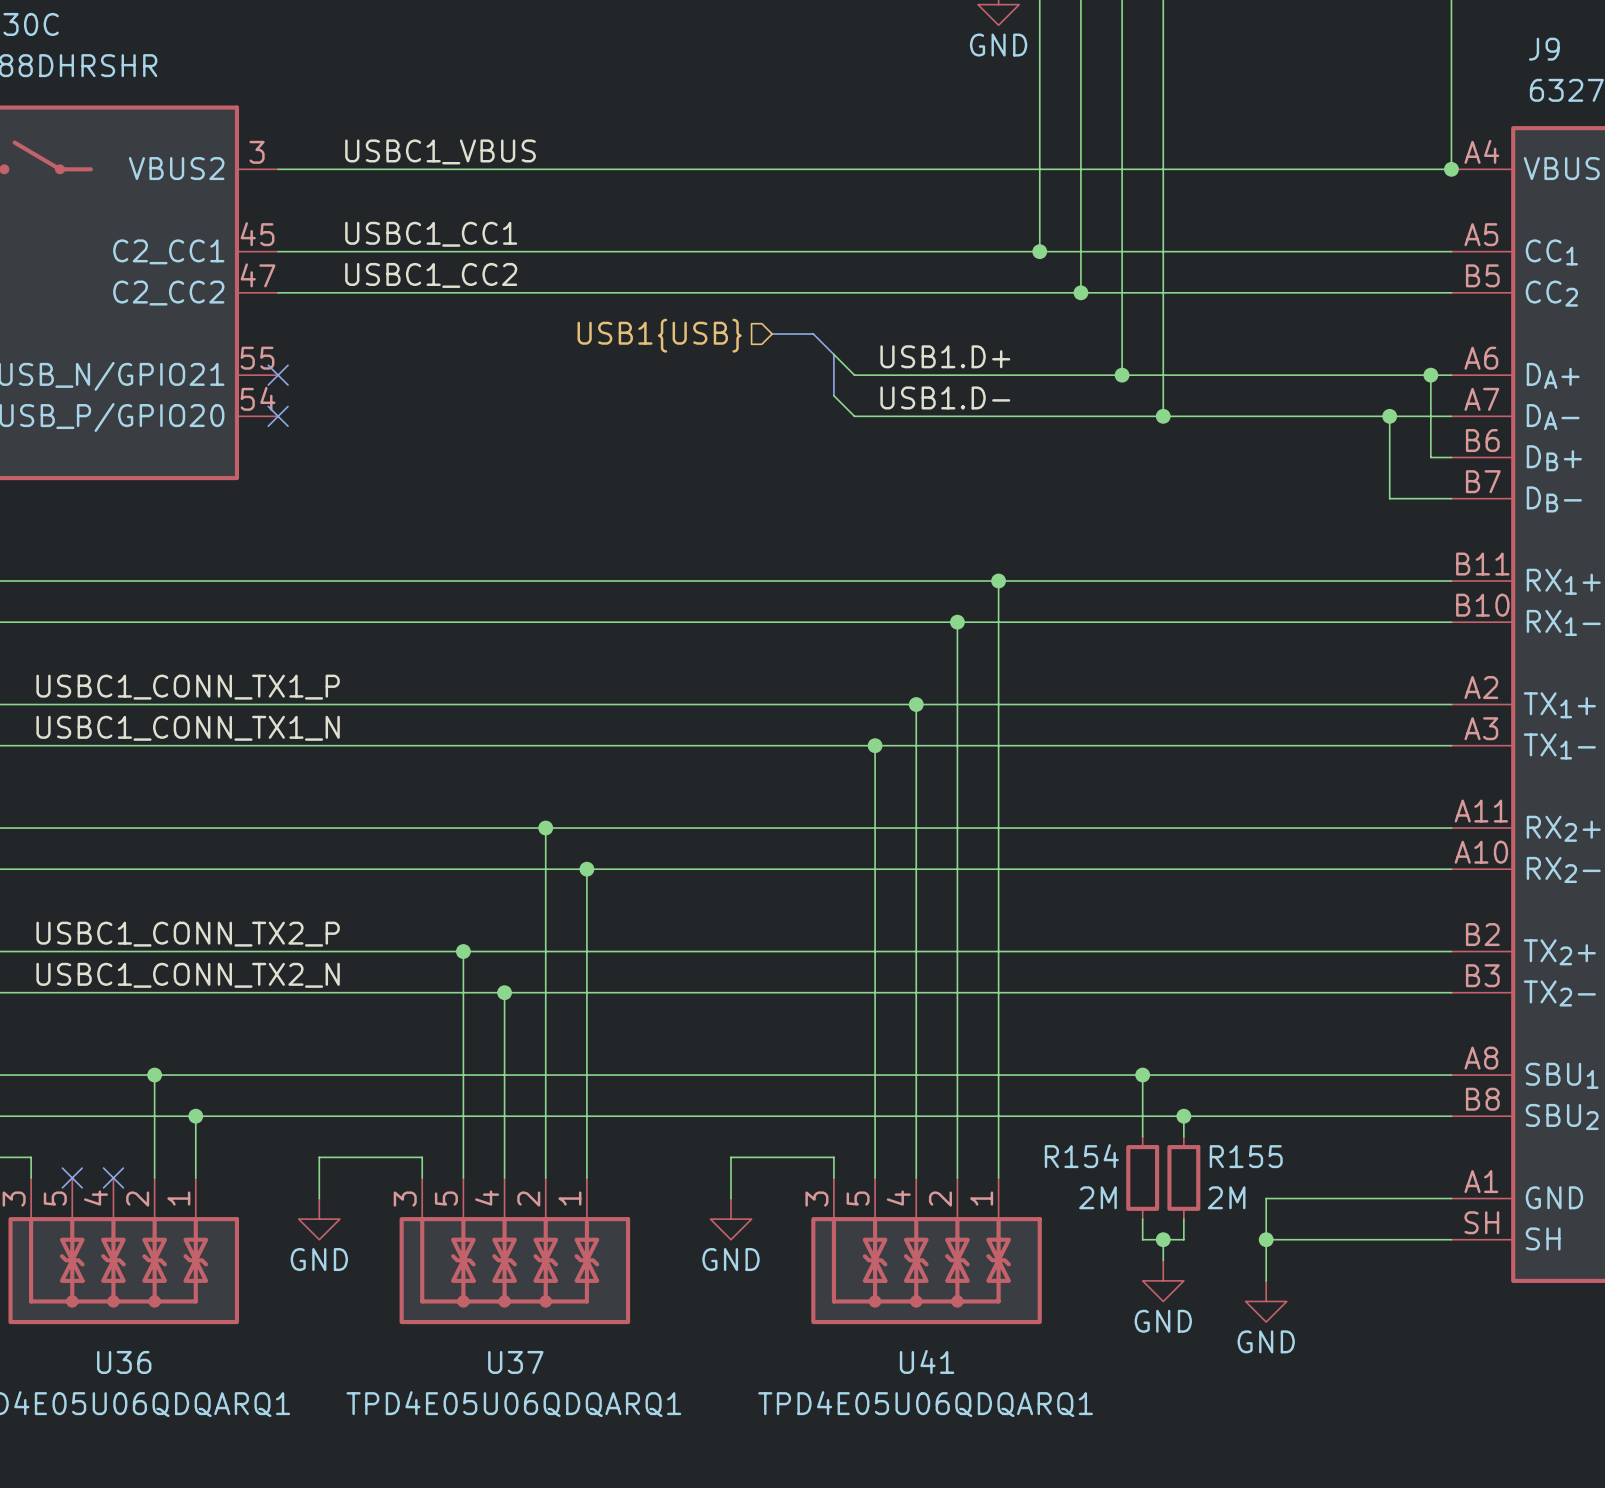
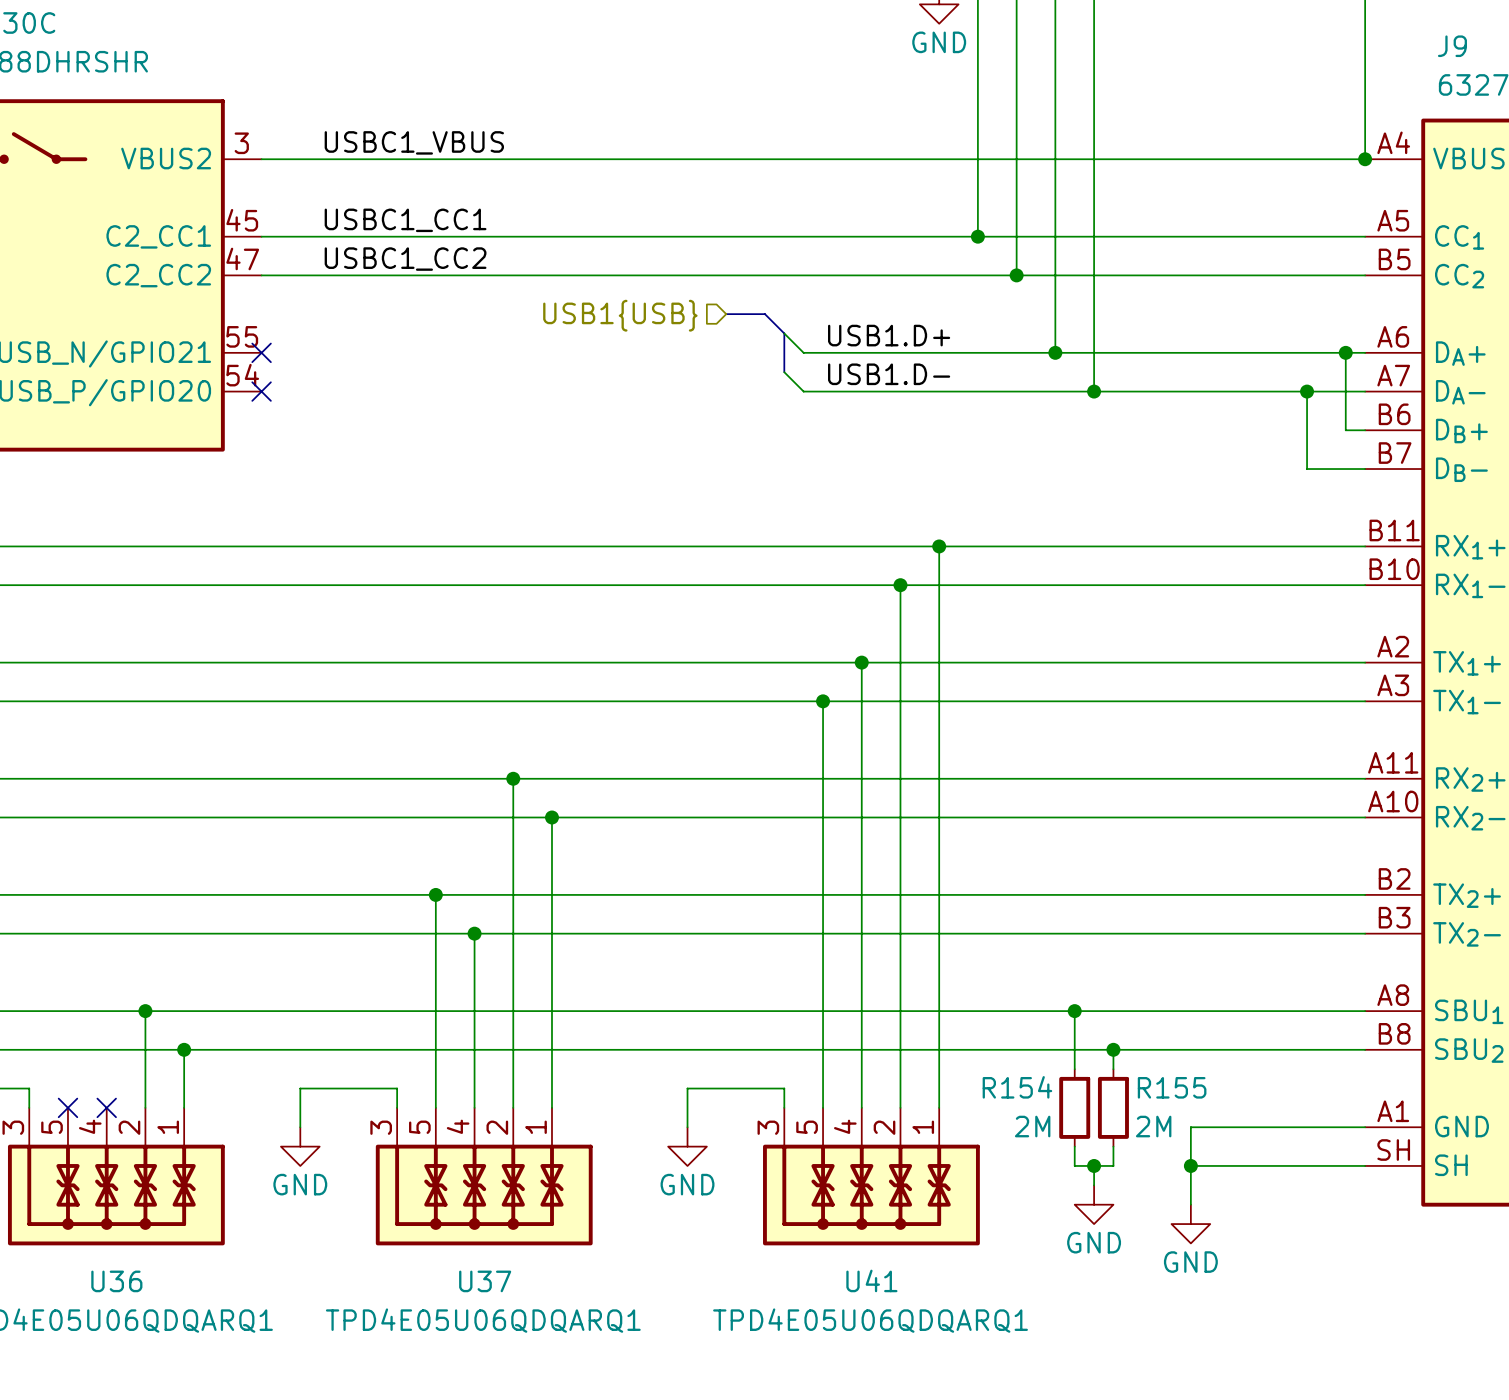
label: USBC1_CONN_TX1_P (188, 687) -> none
label: USBC1_CONN_TX1_N (188, 728) -> none
label: USBC1_CONN_TX2_P (188, 934) -> none
label: USBC1_CONN_TX2_N (188, 975) -> none

